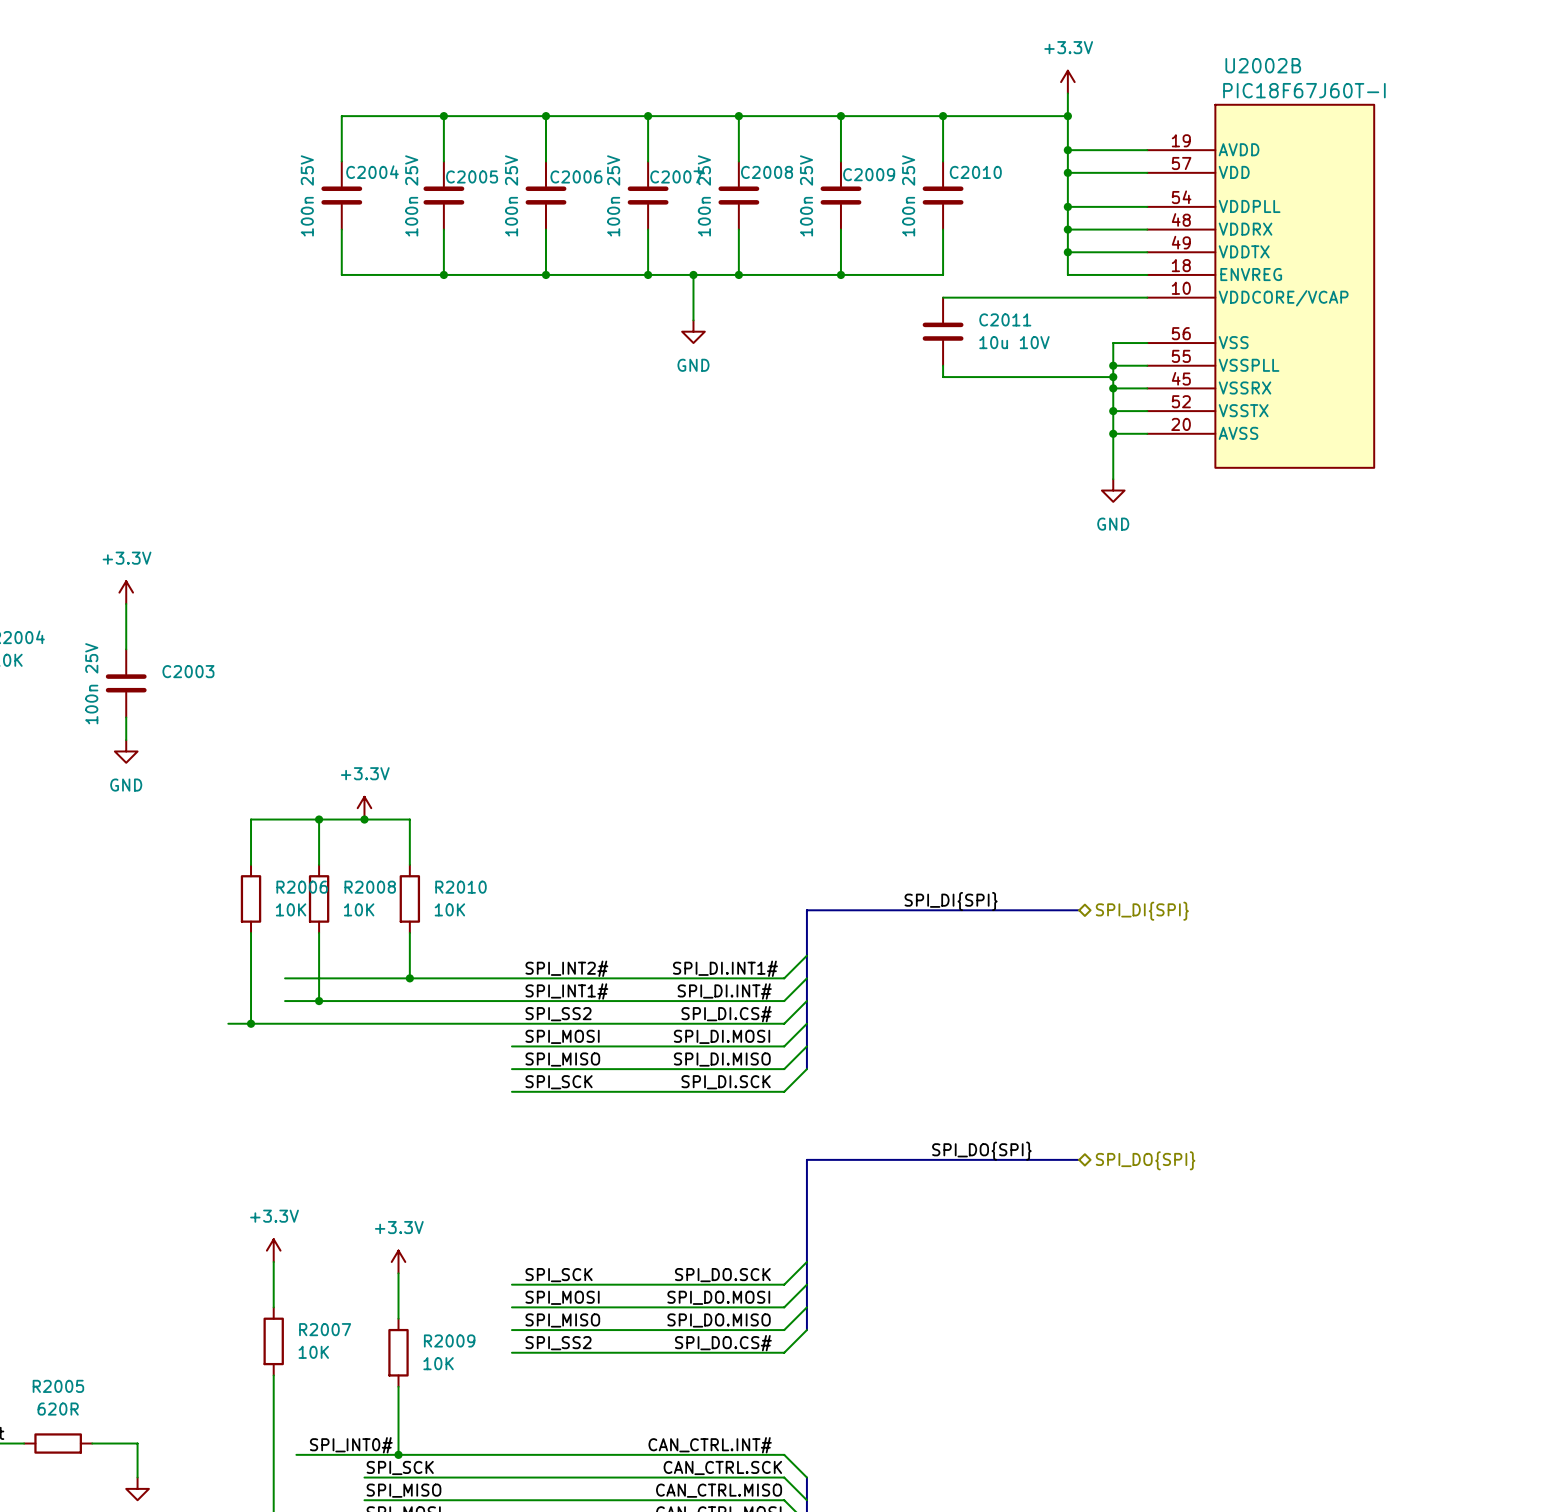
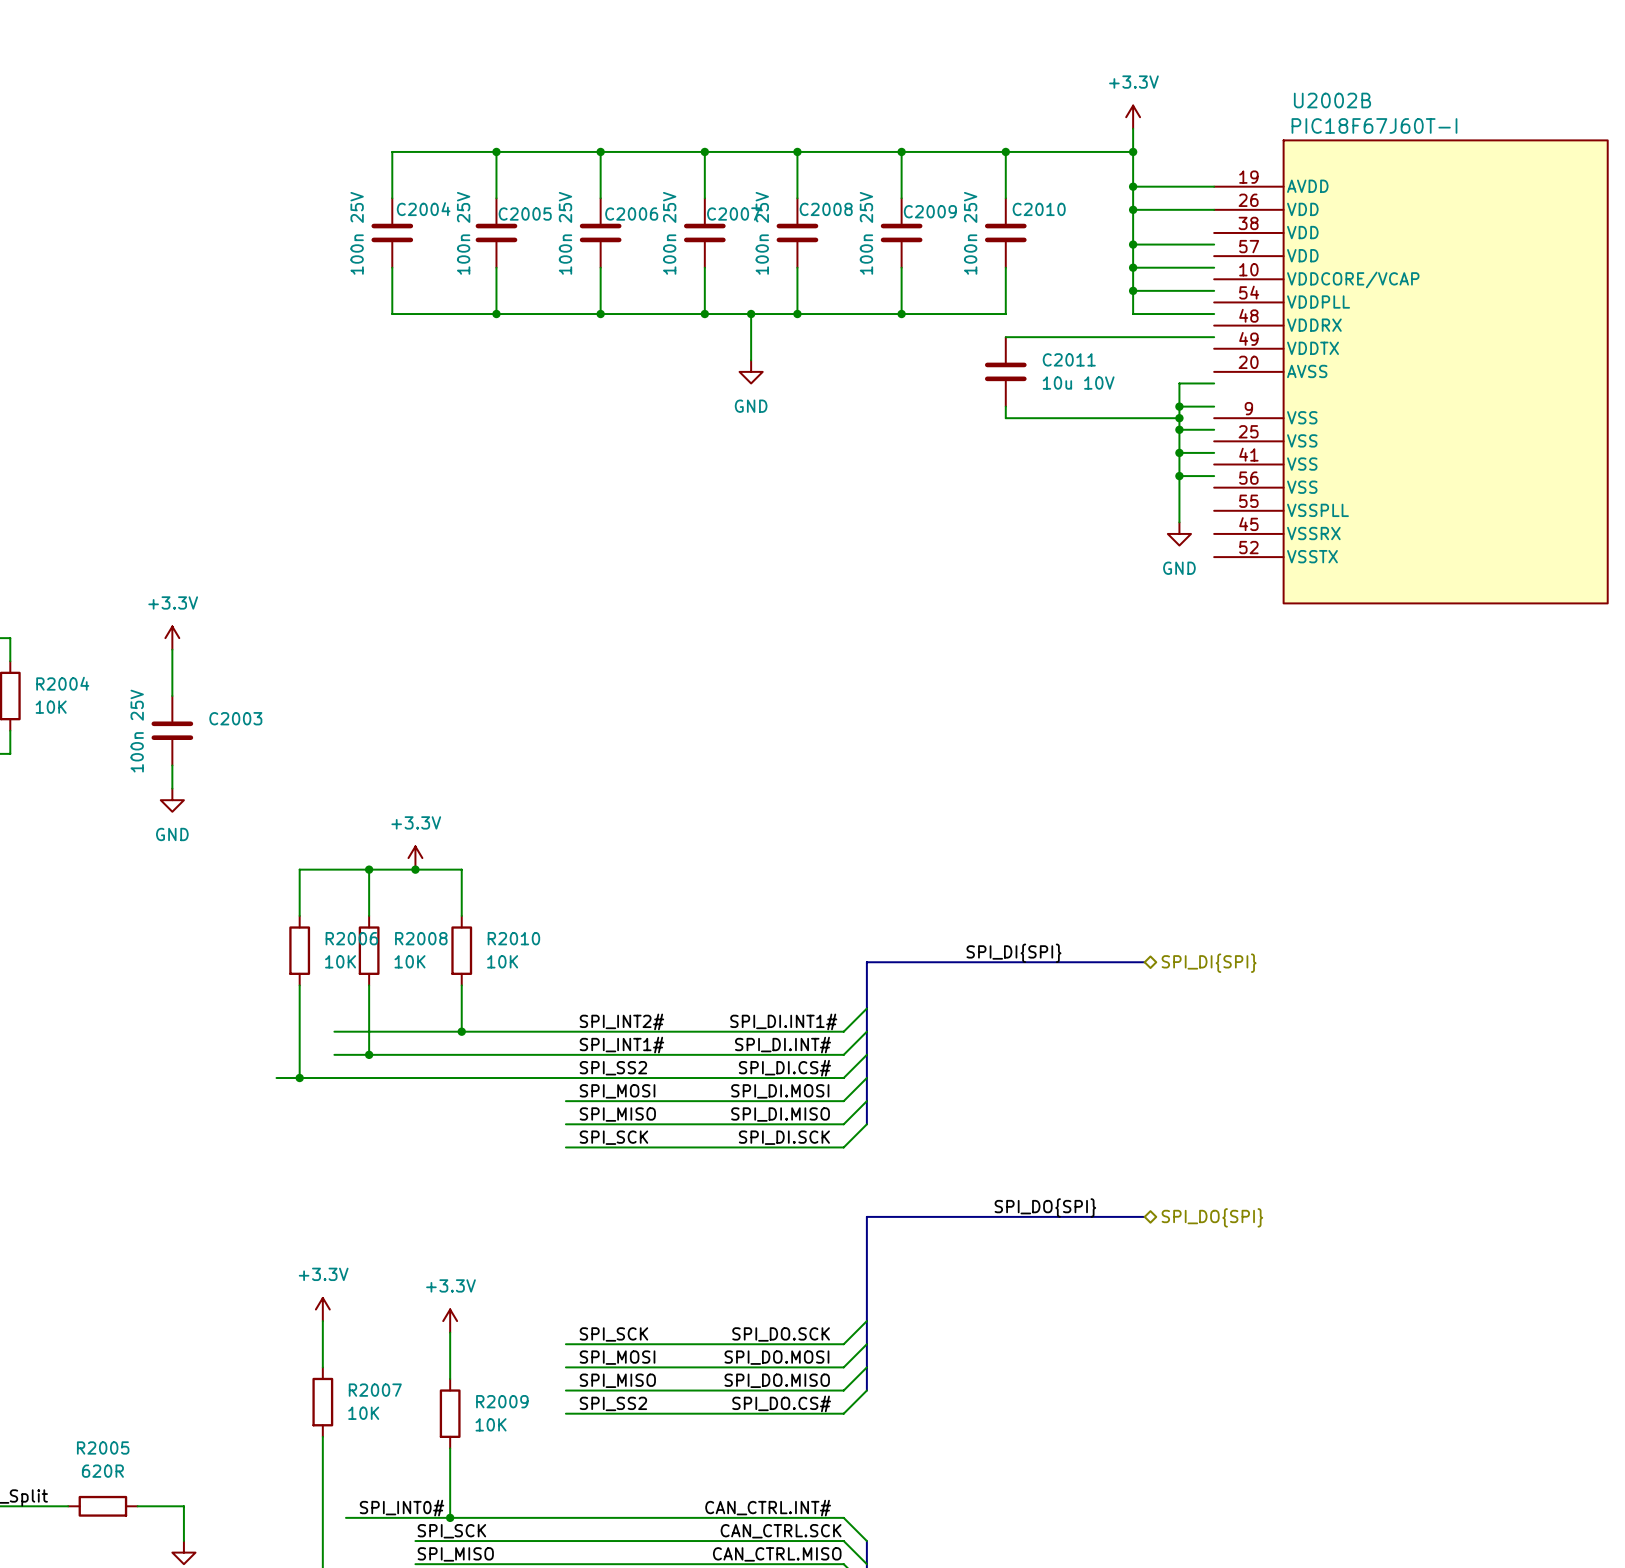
U2002B symbol: [1147, 104, 1375, 468] -> [1214, 140, 1608, 604]

